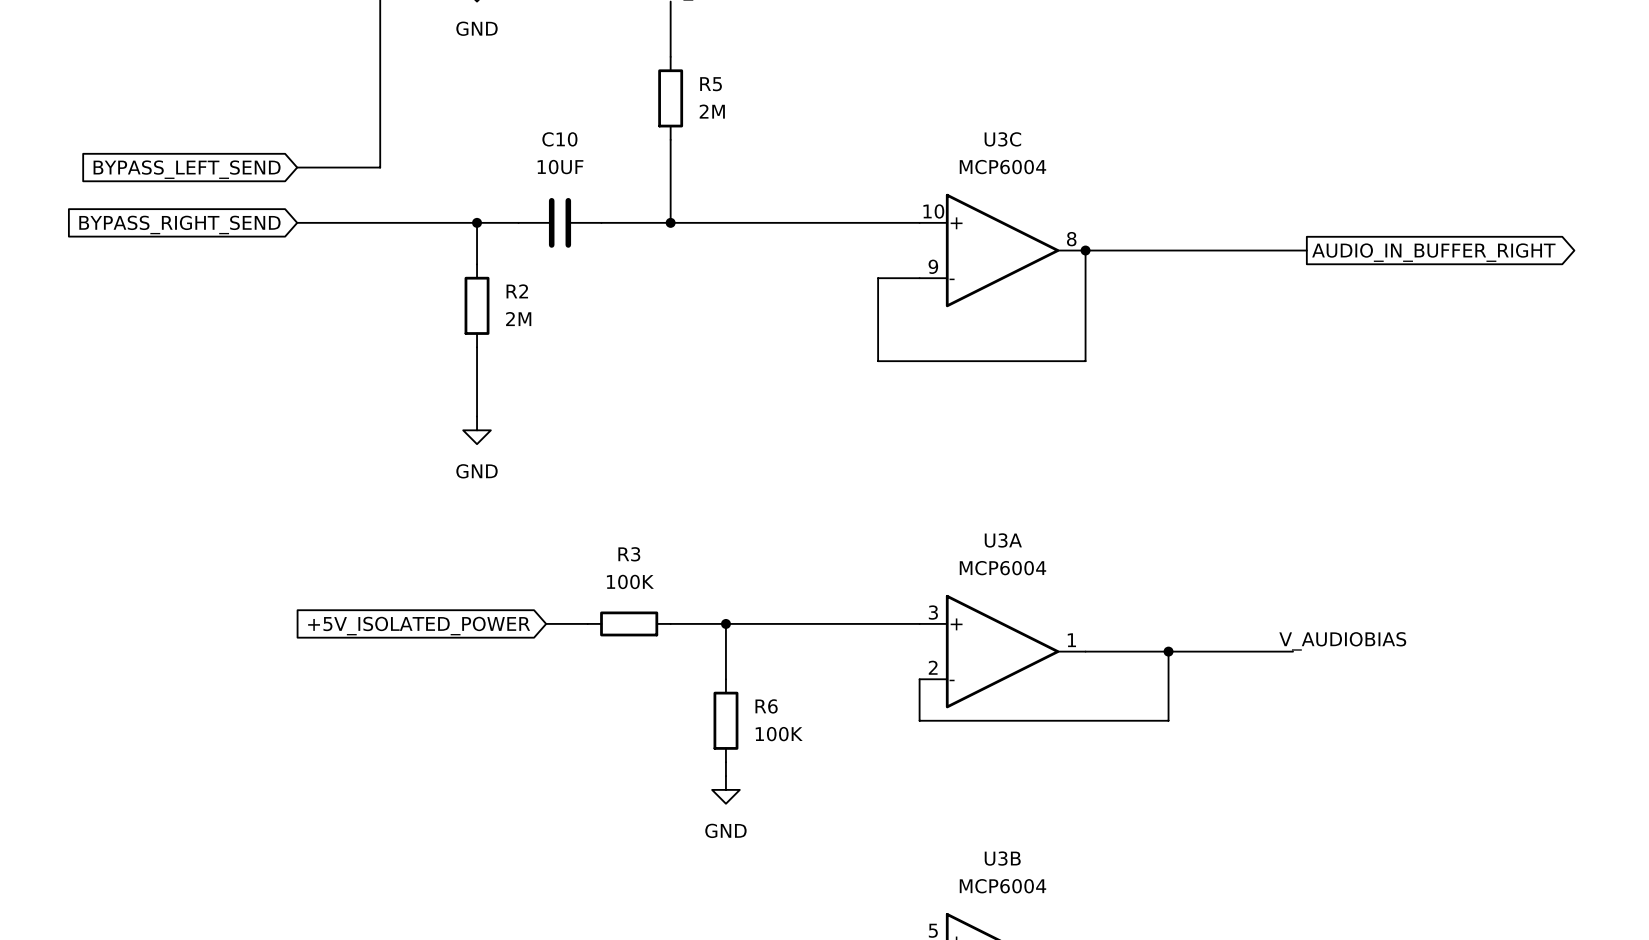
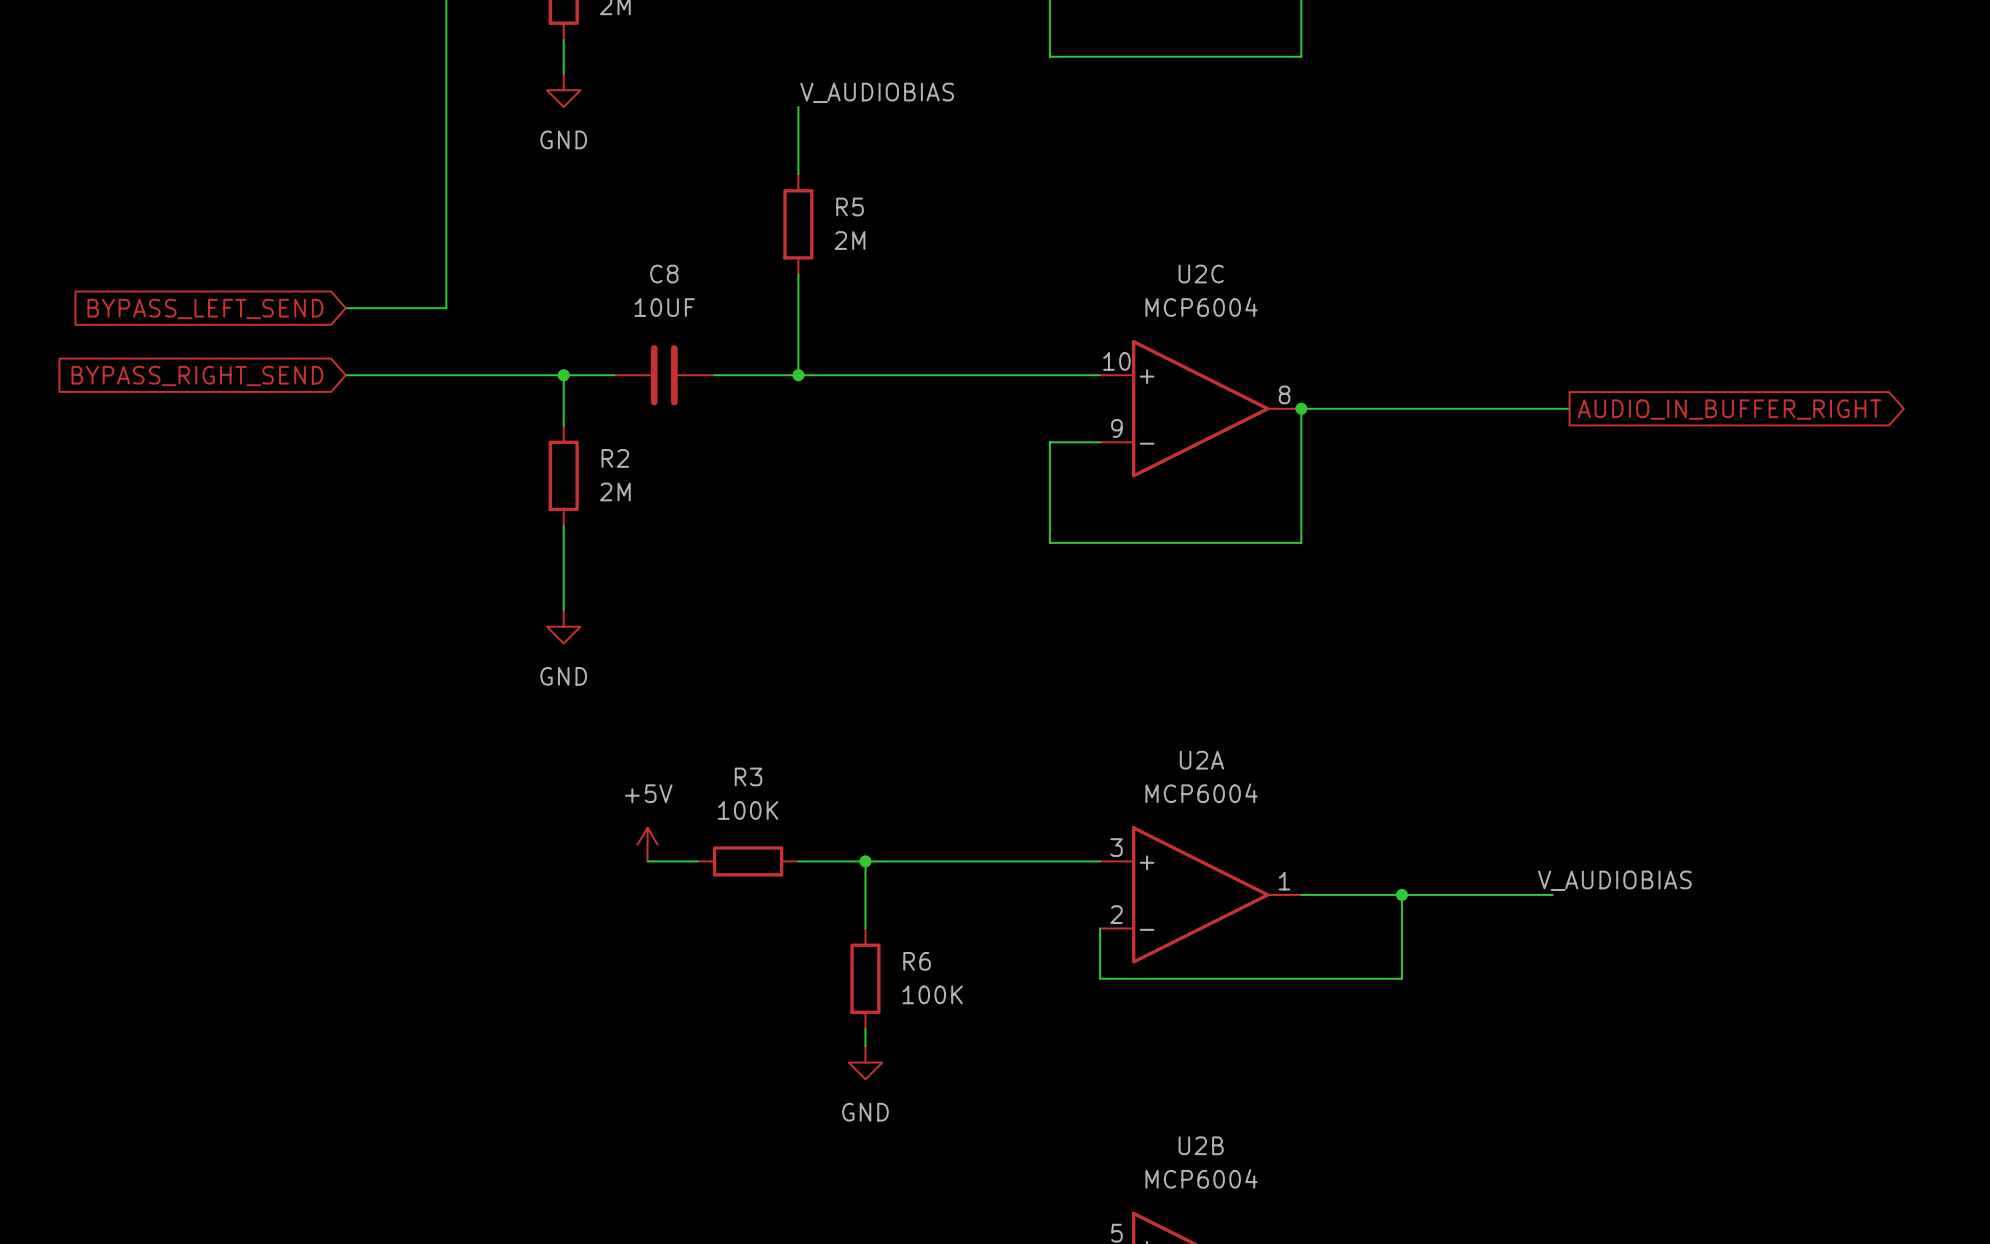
C10 name: C10 (559, 139) -> C8 (664, 274)
U3C name: U3C (1002, 139) -> U2C (1201, 274)
U3A name: U3A (1003, 540) -> U2A (1201, 760)
power symbol: none -> +5V (647, 844)
global label: +5V_ISOLATED_POWER (419, 626) -> none
U3B name: U3B (1002, 858) -> U2B (1201, 1145)

